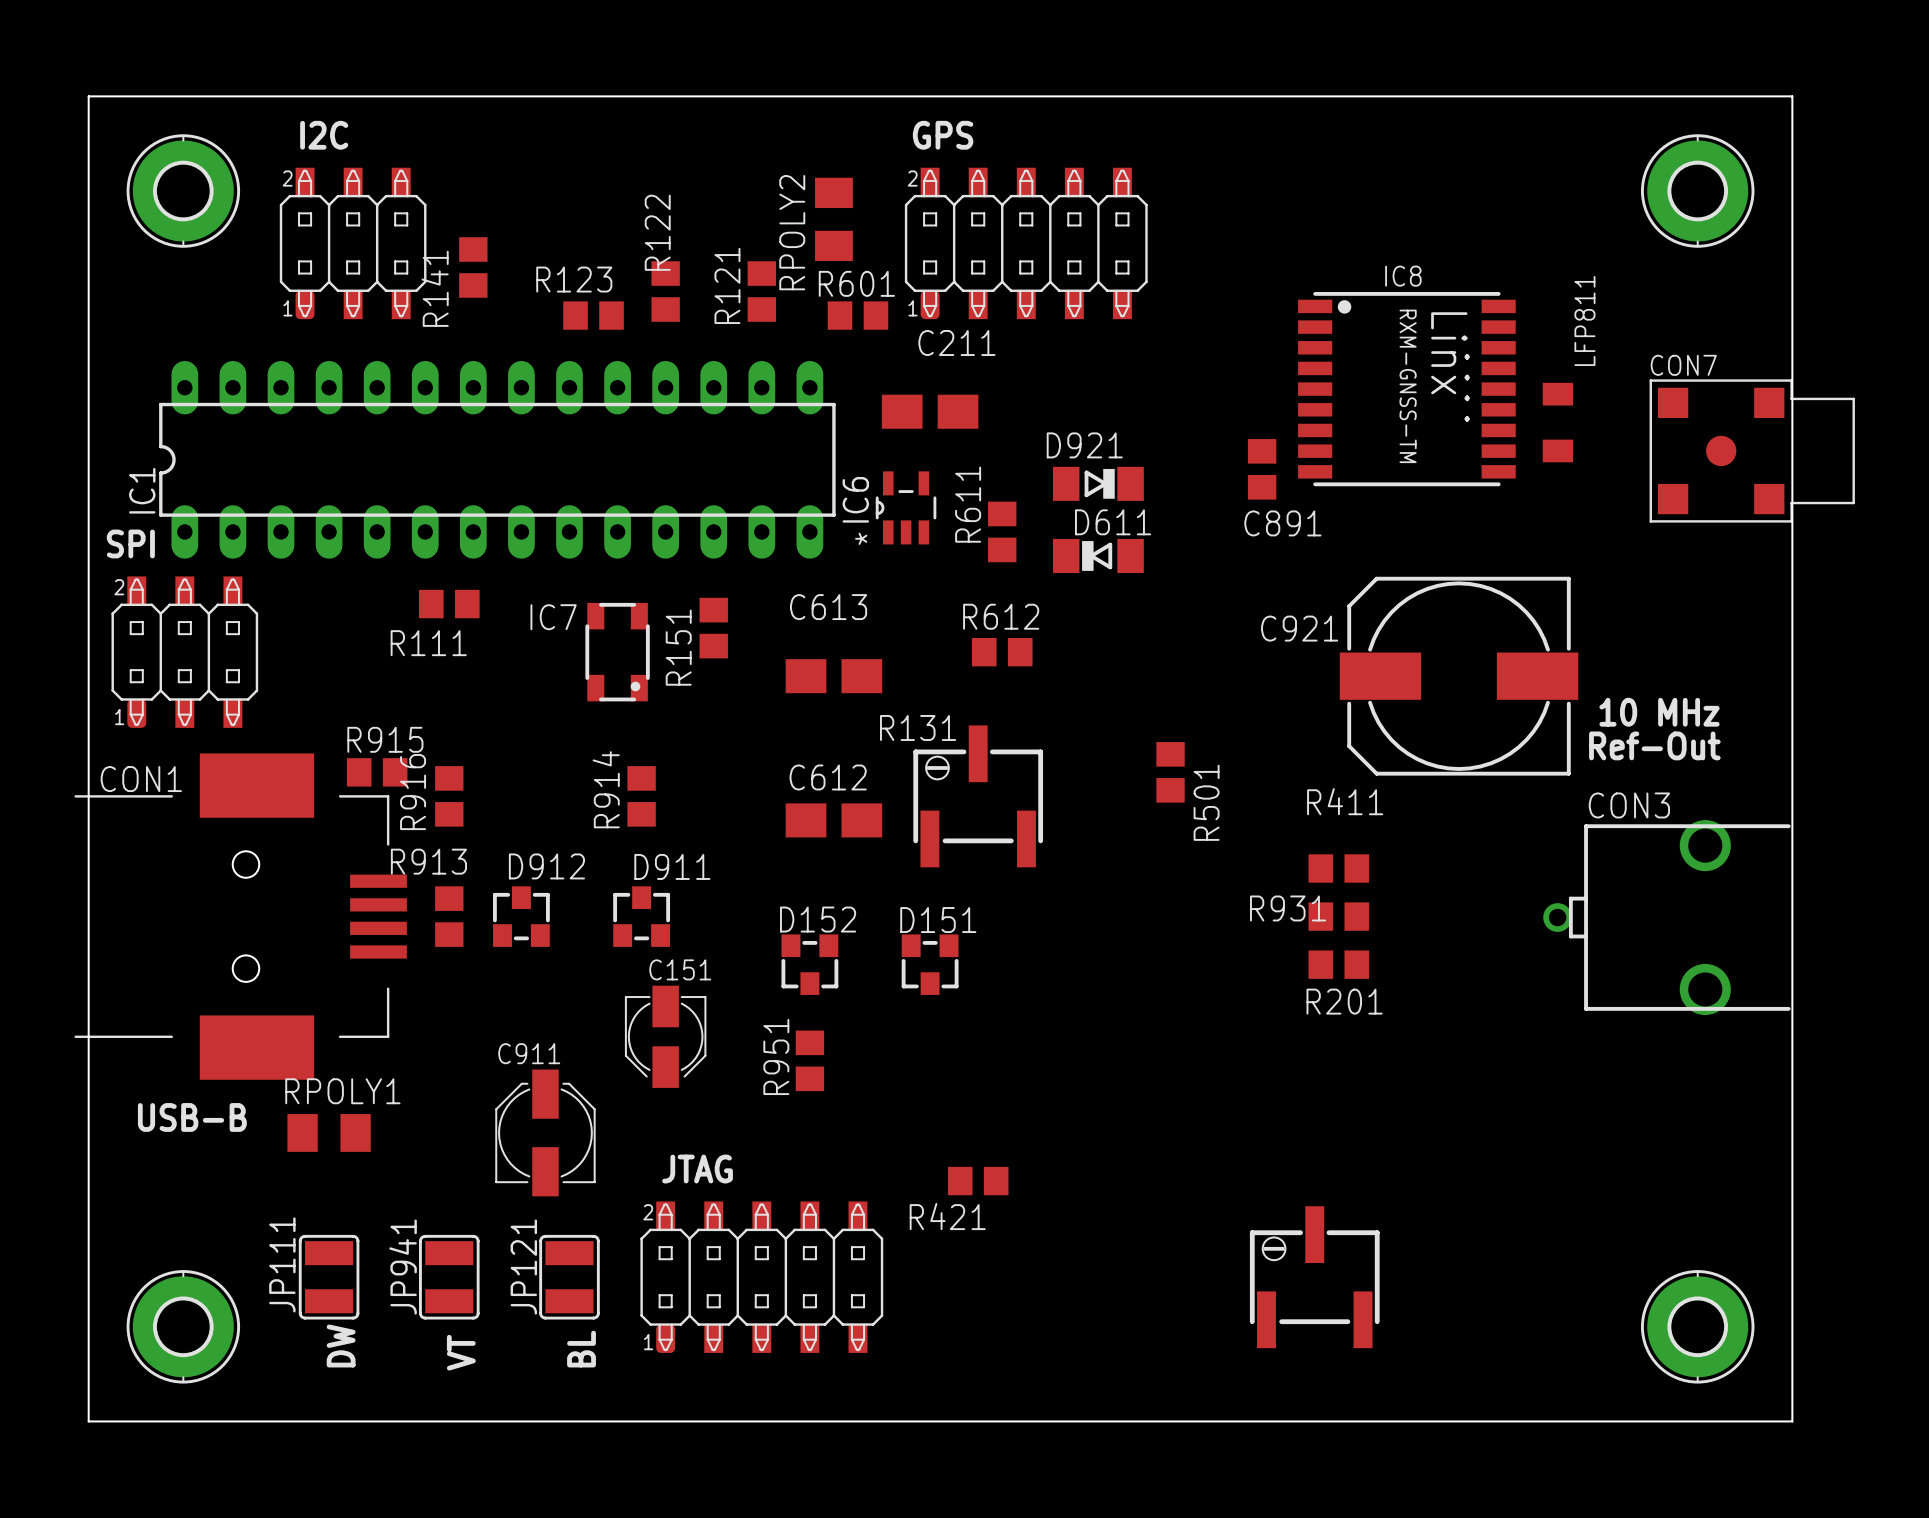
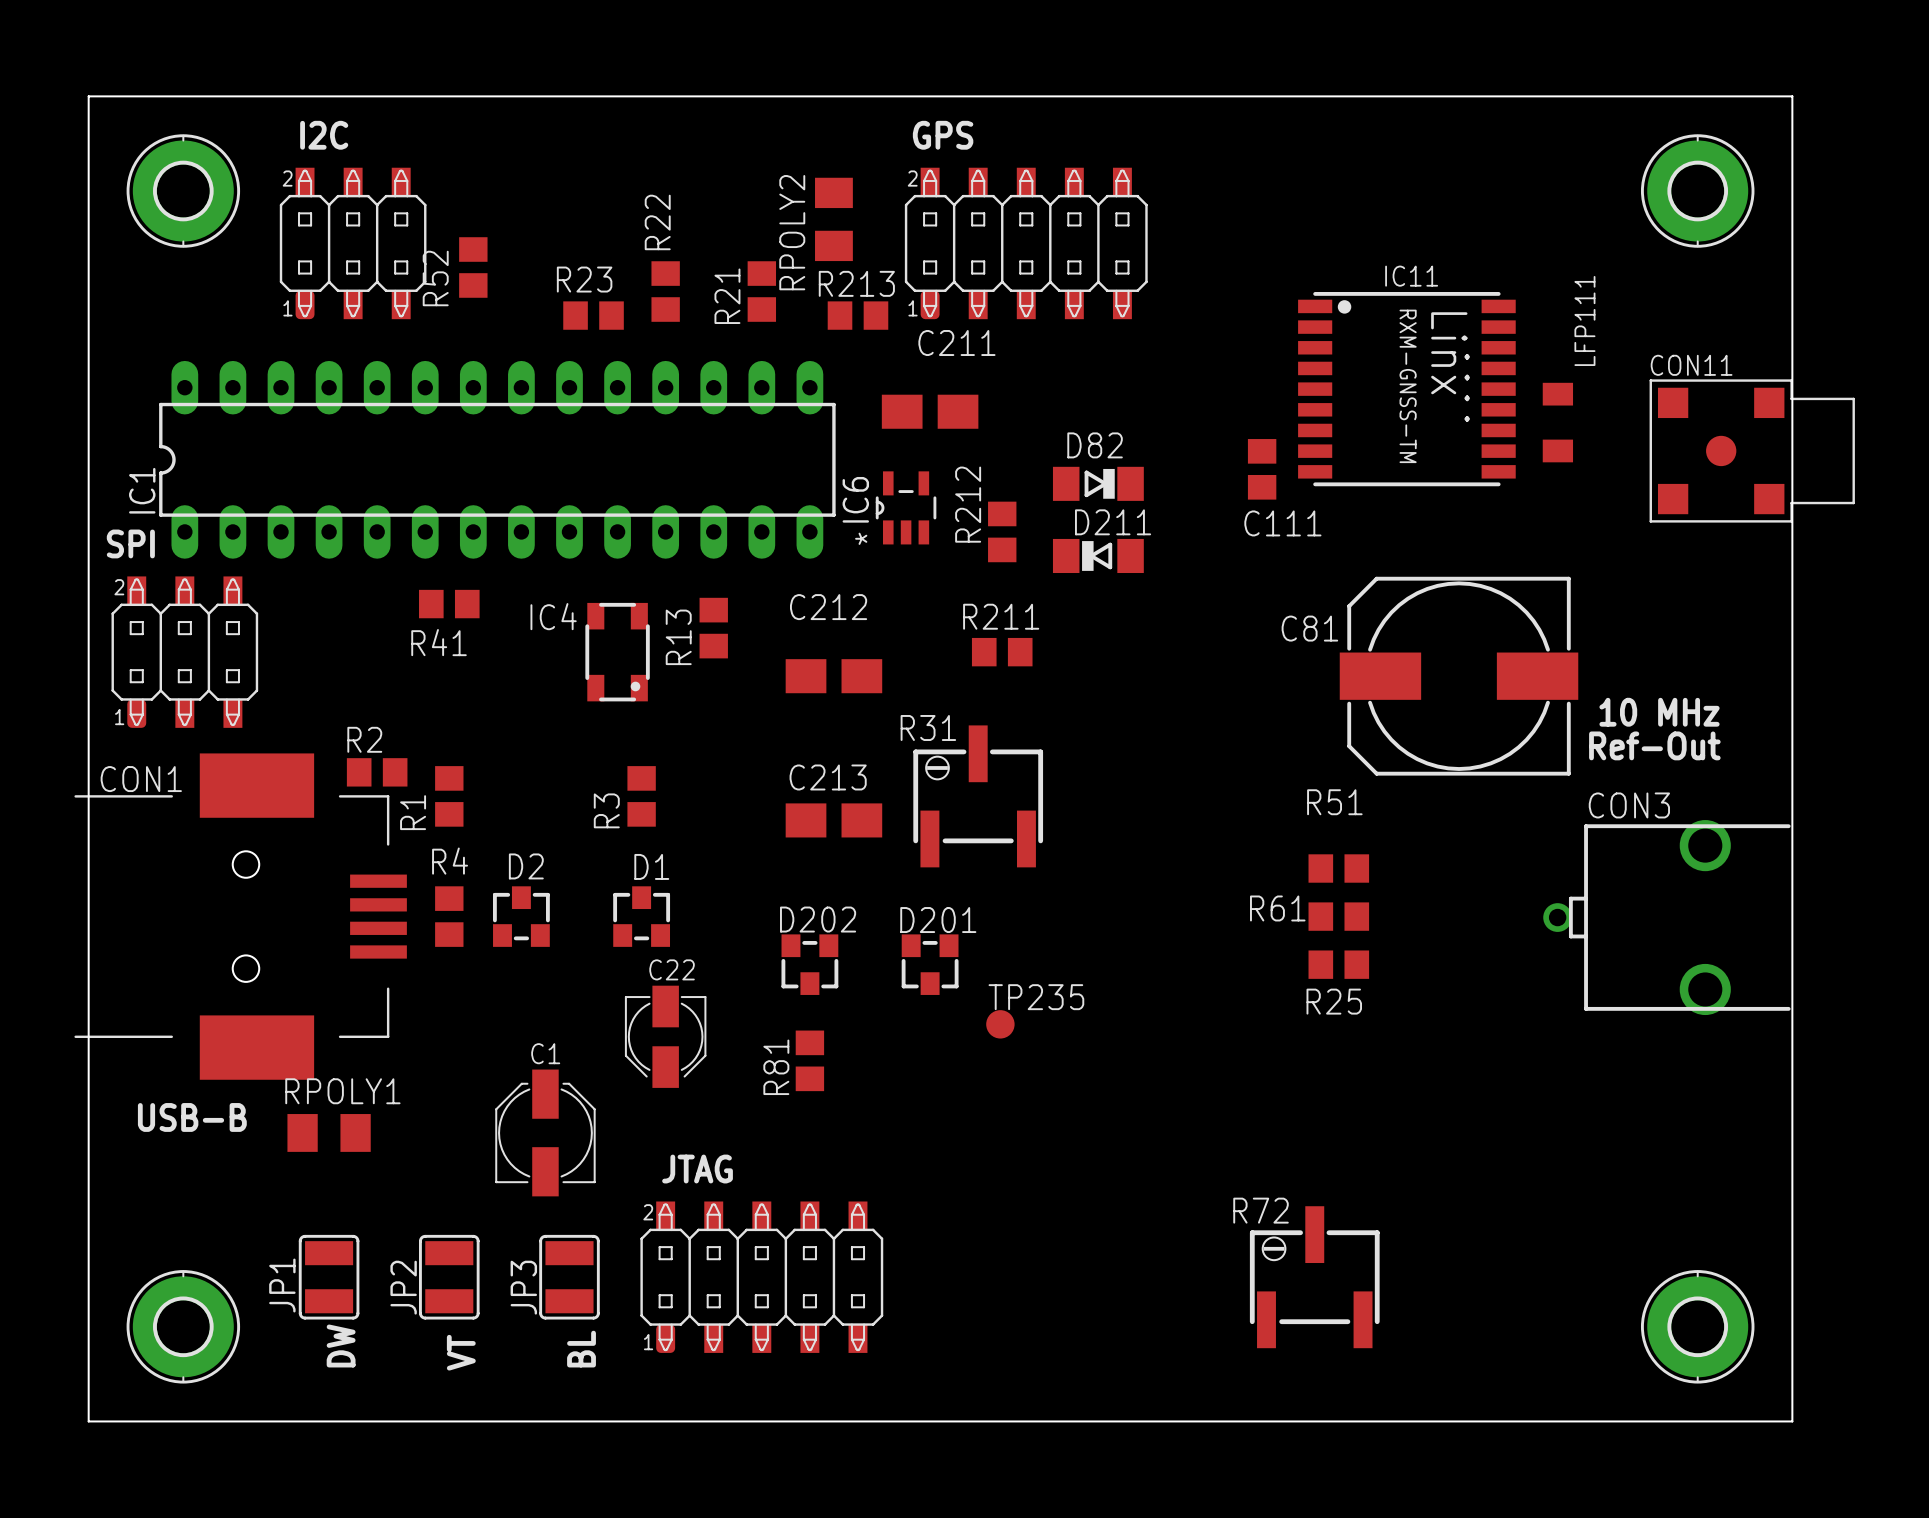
R122 name: R122 (657, 232) -> R22 (657, 222)
IC8 name: IC8 (1403, 276) -> IC11 (1411, 276)
R123 name: R123 (574, 279) -> R23 (584, 279)
R601 name: R601 (856, 283) -> R213 (856, 283)
R121 name: R121 (727, 285) -> R21 (727, 296)
R141 name: R141 (435, 288) -> R52 (435, 278)
LFP811 name: LFP811 (1584, 320) -> LFP111 (1584, 320)
CON7 name: CON7 (1683, 365) -> CON11 (1691, 365)
D921 name: D921 (1084, 445) -> D82 (1095, 445)
R611 name: R611 (968, 504) -> R212 (968, 504)
D611 name: D611 (1113, 522) -> D211 (1113, 522)
C891 name: C891 (1282, 523) -> C111 (1282, 523)
C613 name: C613 (828, 607) -> C212 (828, 607)
R612 name: R612 (1001, 616) -> R211 (1001, 616)
IC7 name: IC7 (553, 617) -> IC4 (553, 616)
C921 name: C921 (1299, 628) -> C81 (1309, 628)
R111 name: R111 (428, 643) -> R41 (439, 642)
R151 name: R151 (678, 647) -> R13 (678, 637)
R131 name: R131 (918, 727) -> R31 (928, 727)
R915 name: R915 (385, 739) -> R2 (364, 739)
R501: (1170, 772) -> none
C612 name: C612 (828, 777) -> C213 (828, 777)
R914 name: R914 (606, 789) -> R3 (606, 810)
R916 name: R916 (413, 792) -> R1 (413, 812)
R411 name: R411 (1345, 801) -> R51 (1334, 802)
R913 name: R913 (428, 861) -> R4 (450, 861)
D912 name: D912 (546, 866) -> D2 (526, 866)
D911 name: D911 (672, 866) -> D1 (651, 866)
R931 name: R931 (1288, 908) -> R61 (1277, 908)
D152 name: D152 (818, 919) -> D202 (818, 919)
D151 name: D151 (938, 920) -> D201 (938, 920)
C151 name: C151 (680, 969) -> C22 (672, 969)
R201 name: R201 (1344, 1001) -> R25 (1334, 1001)
TP235: none -> (1000, 1024)
C911 name: C911 (529, 1053) -> C1 (545, 1053)
R951 name: R951 (776, 1056) -> R81 (776, 1067)
R421: (978, 1181) -> none
R72 name: none -> R72 (1261, 1210)
JP111 name: JP111 (282, 1264) -> JP1 (282, 1285)
JP941 name: JP941 (403, 1267) -> JP2 (403, 1287)
JP121 name: JP121 (523, 1267) -> JP3 (523, 1287)

